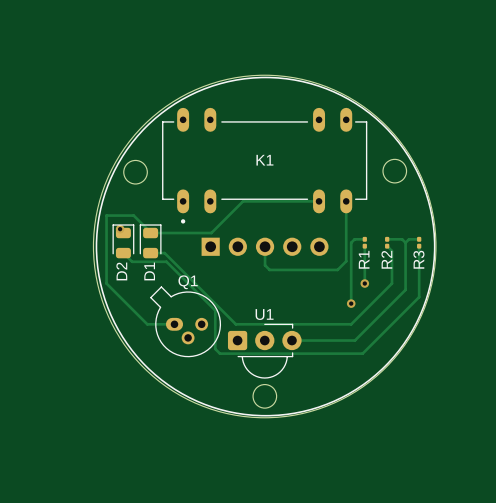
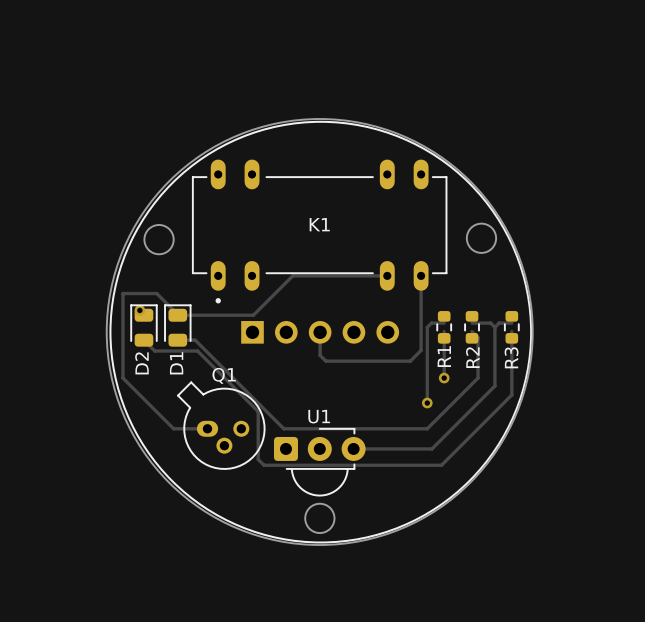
R1 footprint: [362, 236, 367, 249] -> [436, 311, 452, 344]
R2 footprint: [385, 236, 390, 249] -> [464, 311, 480, 344]
R3 footprint: [417, 236, 422, 249] -> [504, 311, 520, 344]

